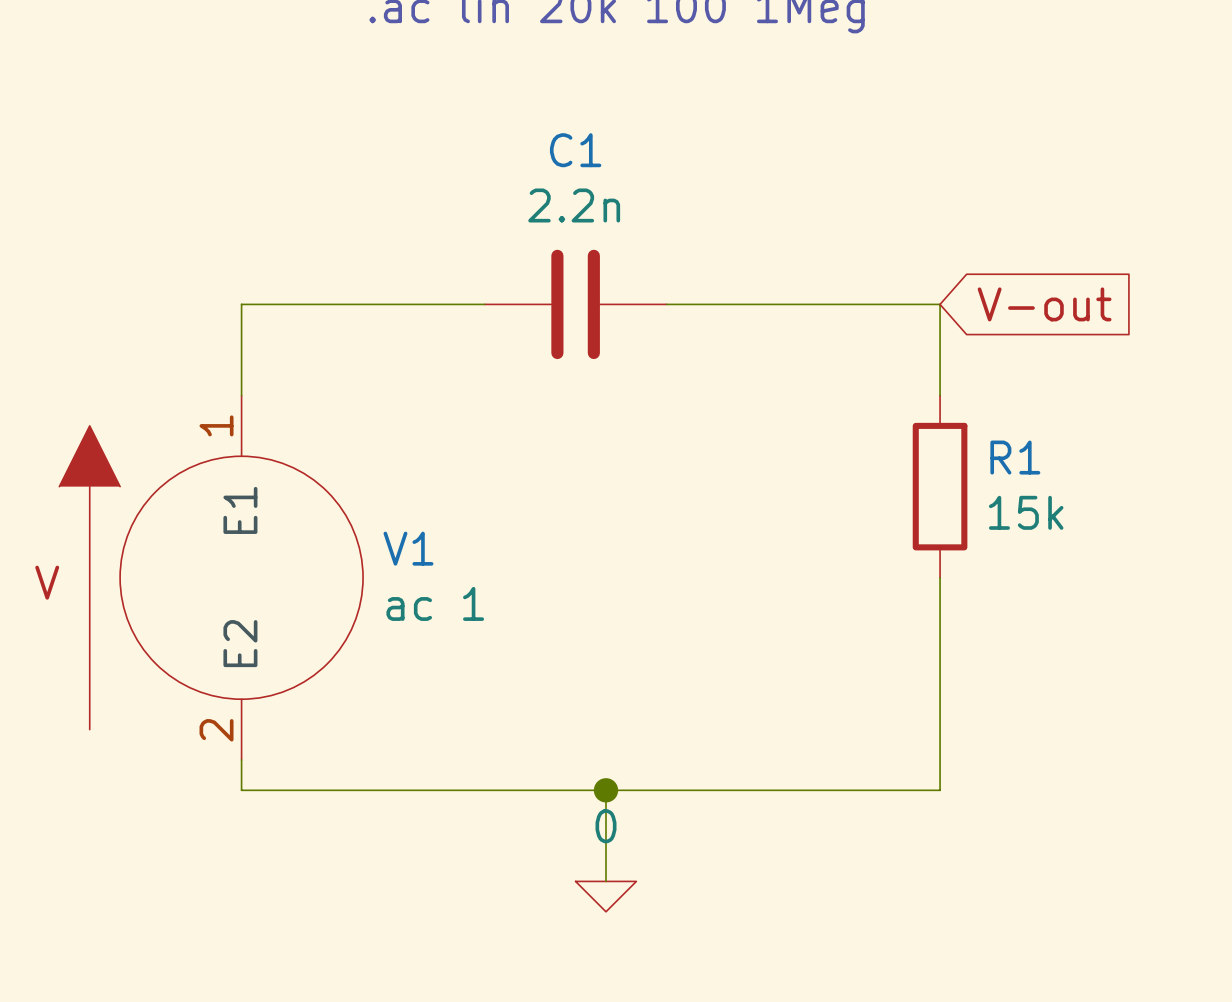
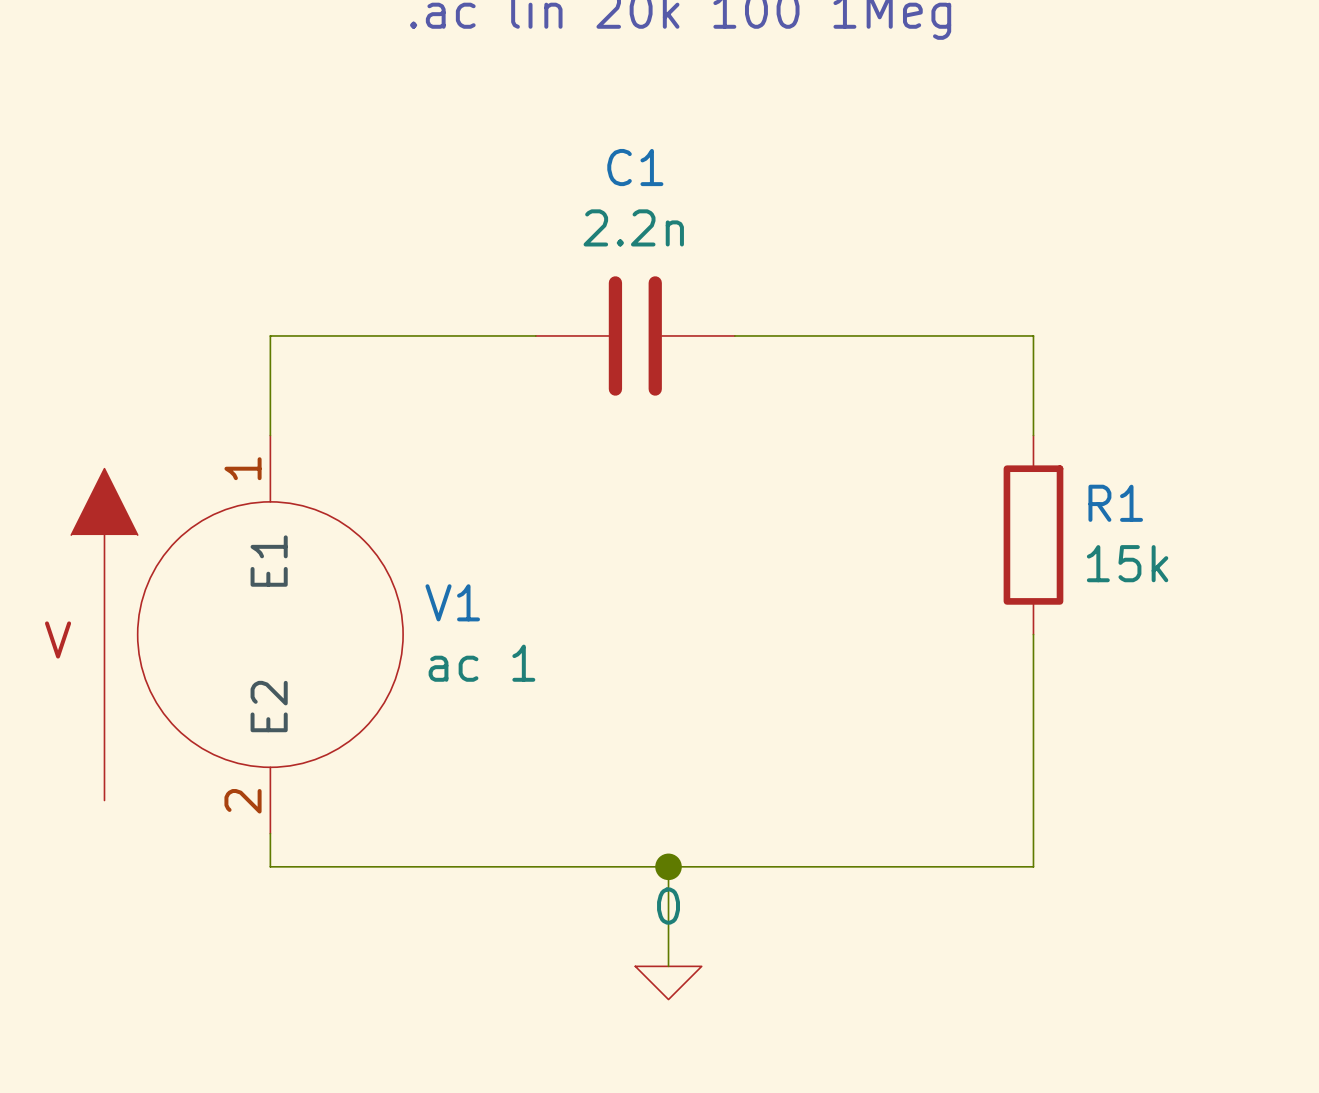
global label: V-out (1044, 304) -> none

